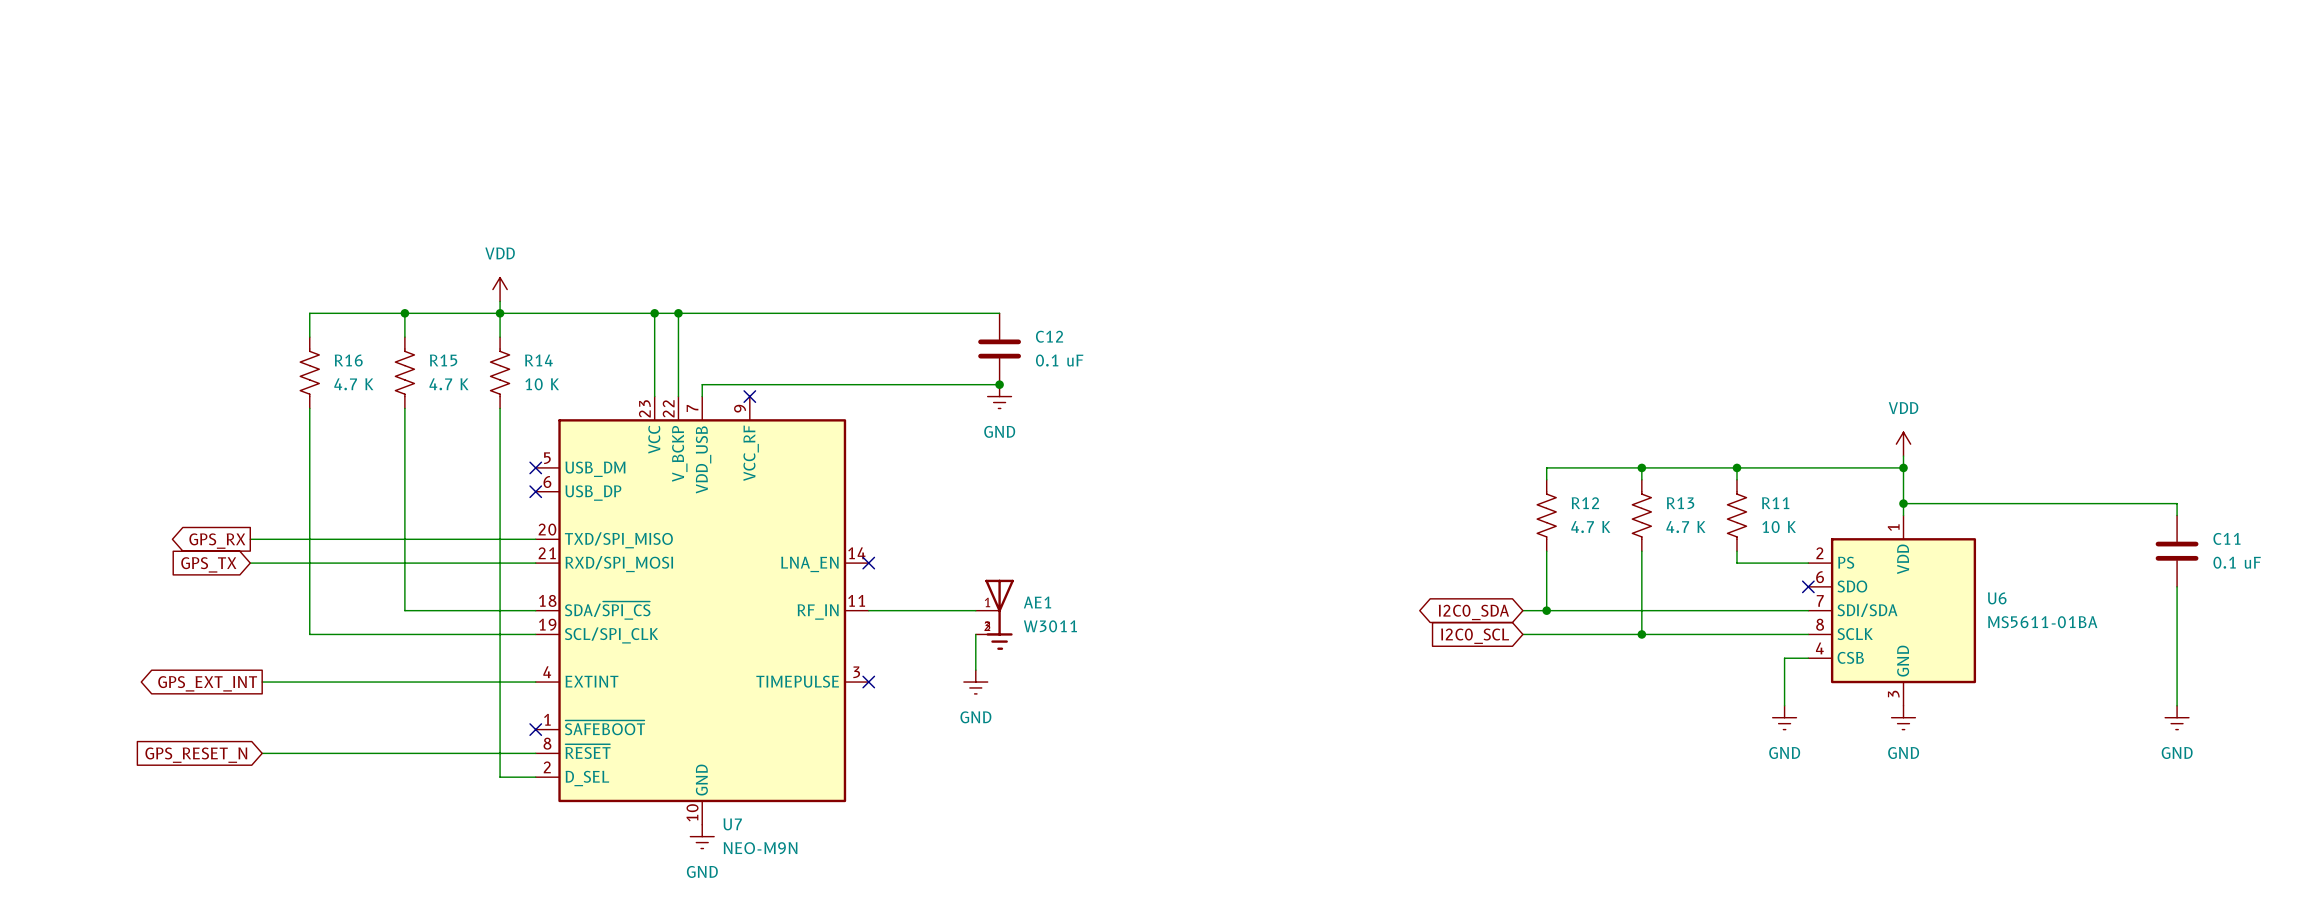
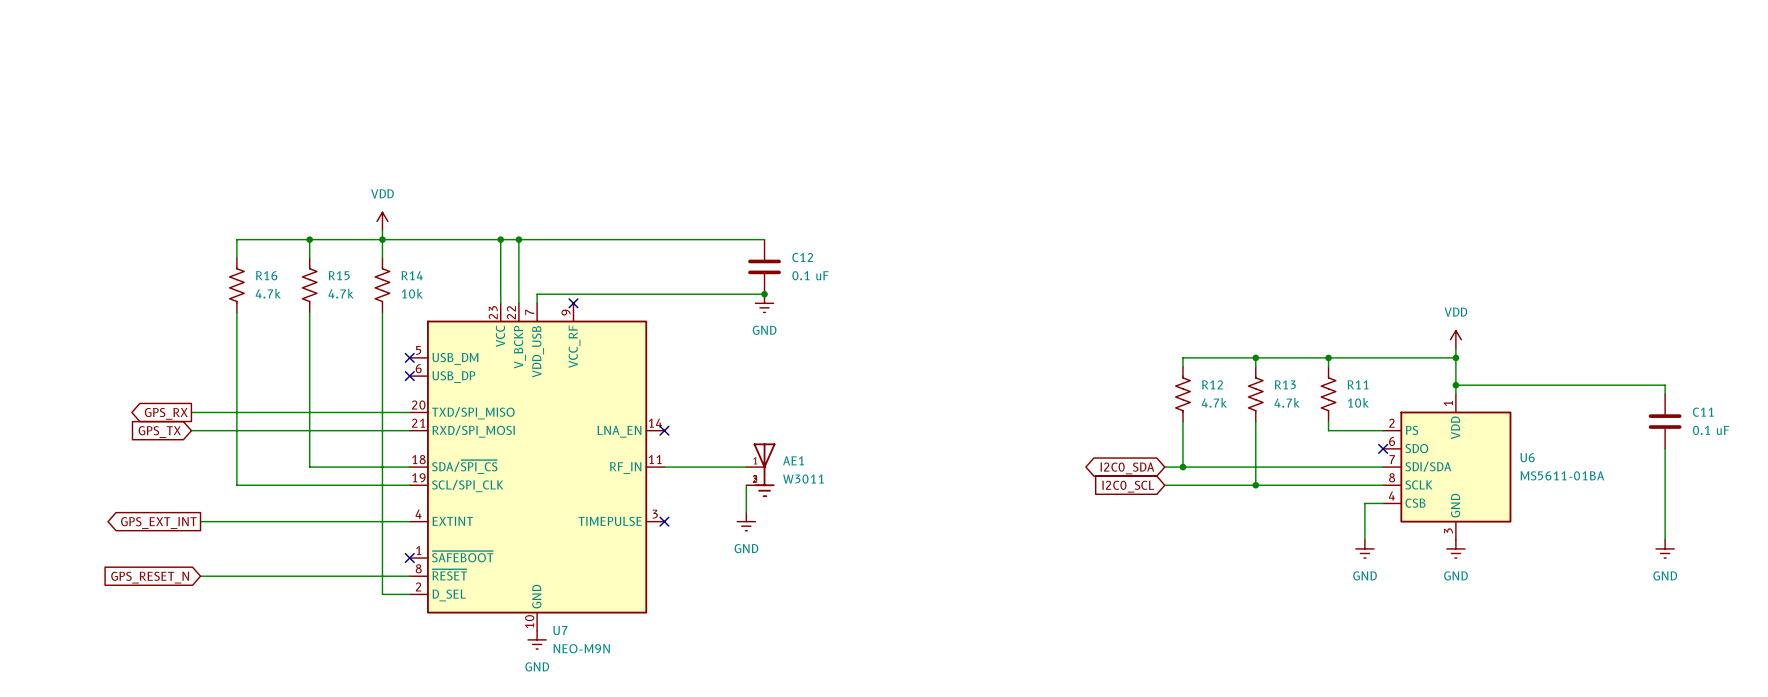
R16 value: 4.7 K (353, 384) -> 4.7k (268, 293)
R15 value: 4.7 K (448, 384) -> 4.7k (341, 293)
R14 value: 10 K (542, 384) -> 10k (412, 293)
R12 value: 4.7 K (1590, 527) -> 4.7k (1214, 402)
R13 value: 4.7 K (1685, 527) -> 4.7k (1287, 402)
R11 value: 10 K (1779, 527) -> 10k (1358, 402)

